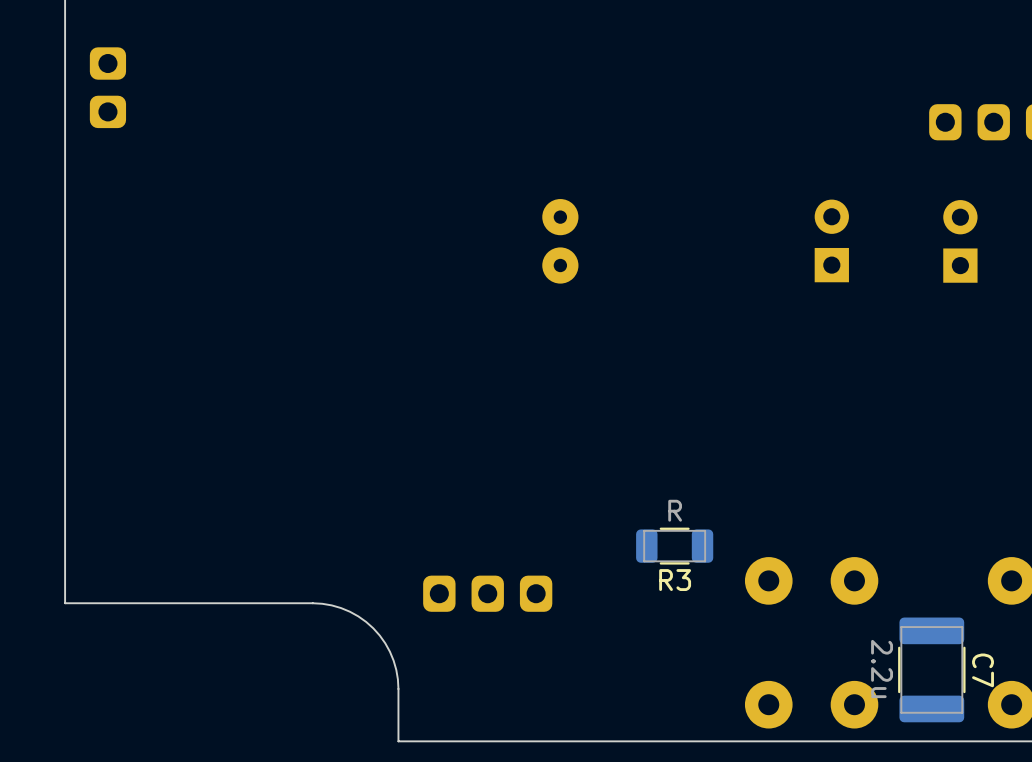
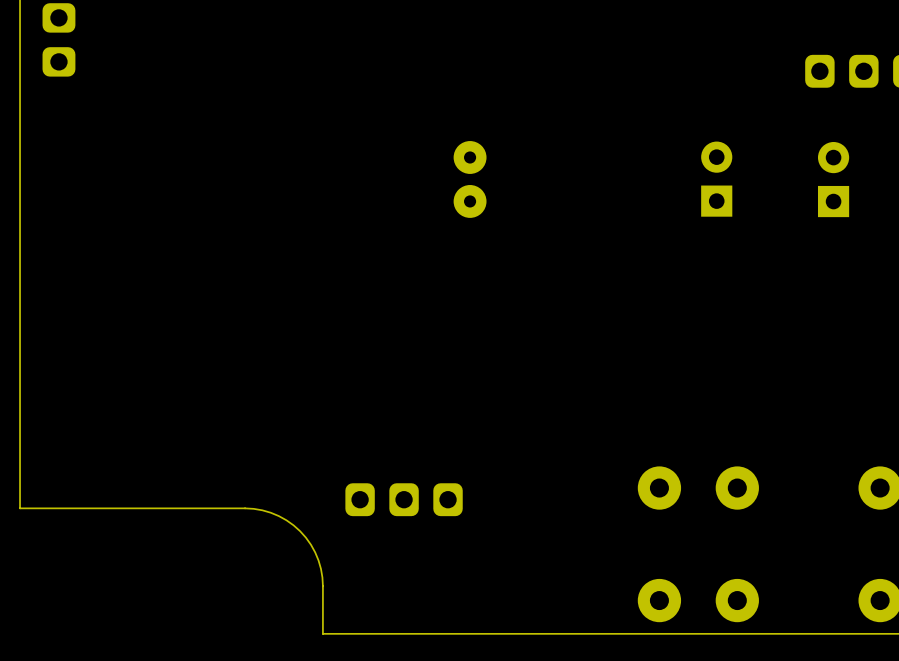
R3: R (674, 546) -> none
C7: 2.2u (931, 669) -> none

